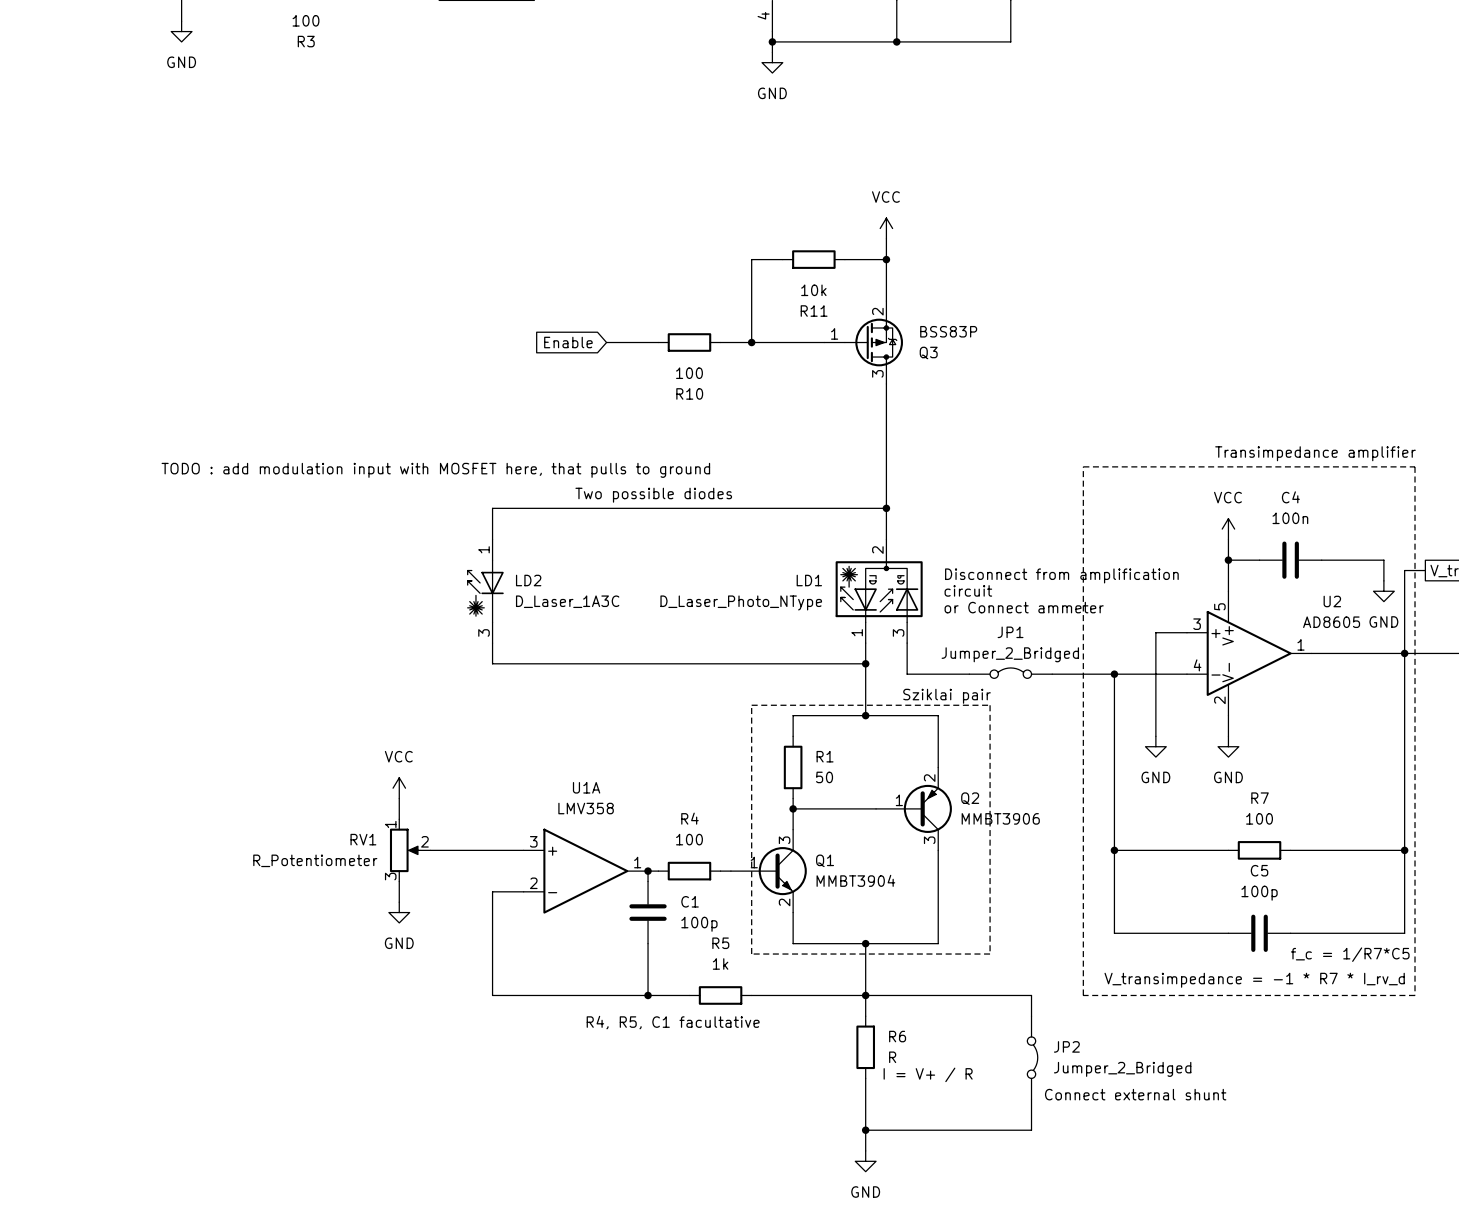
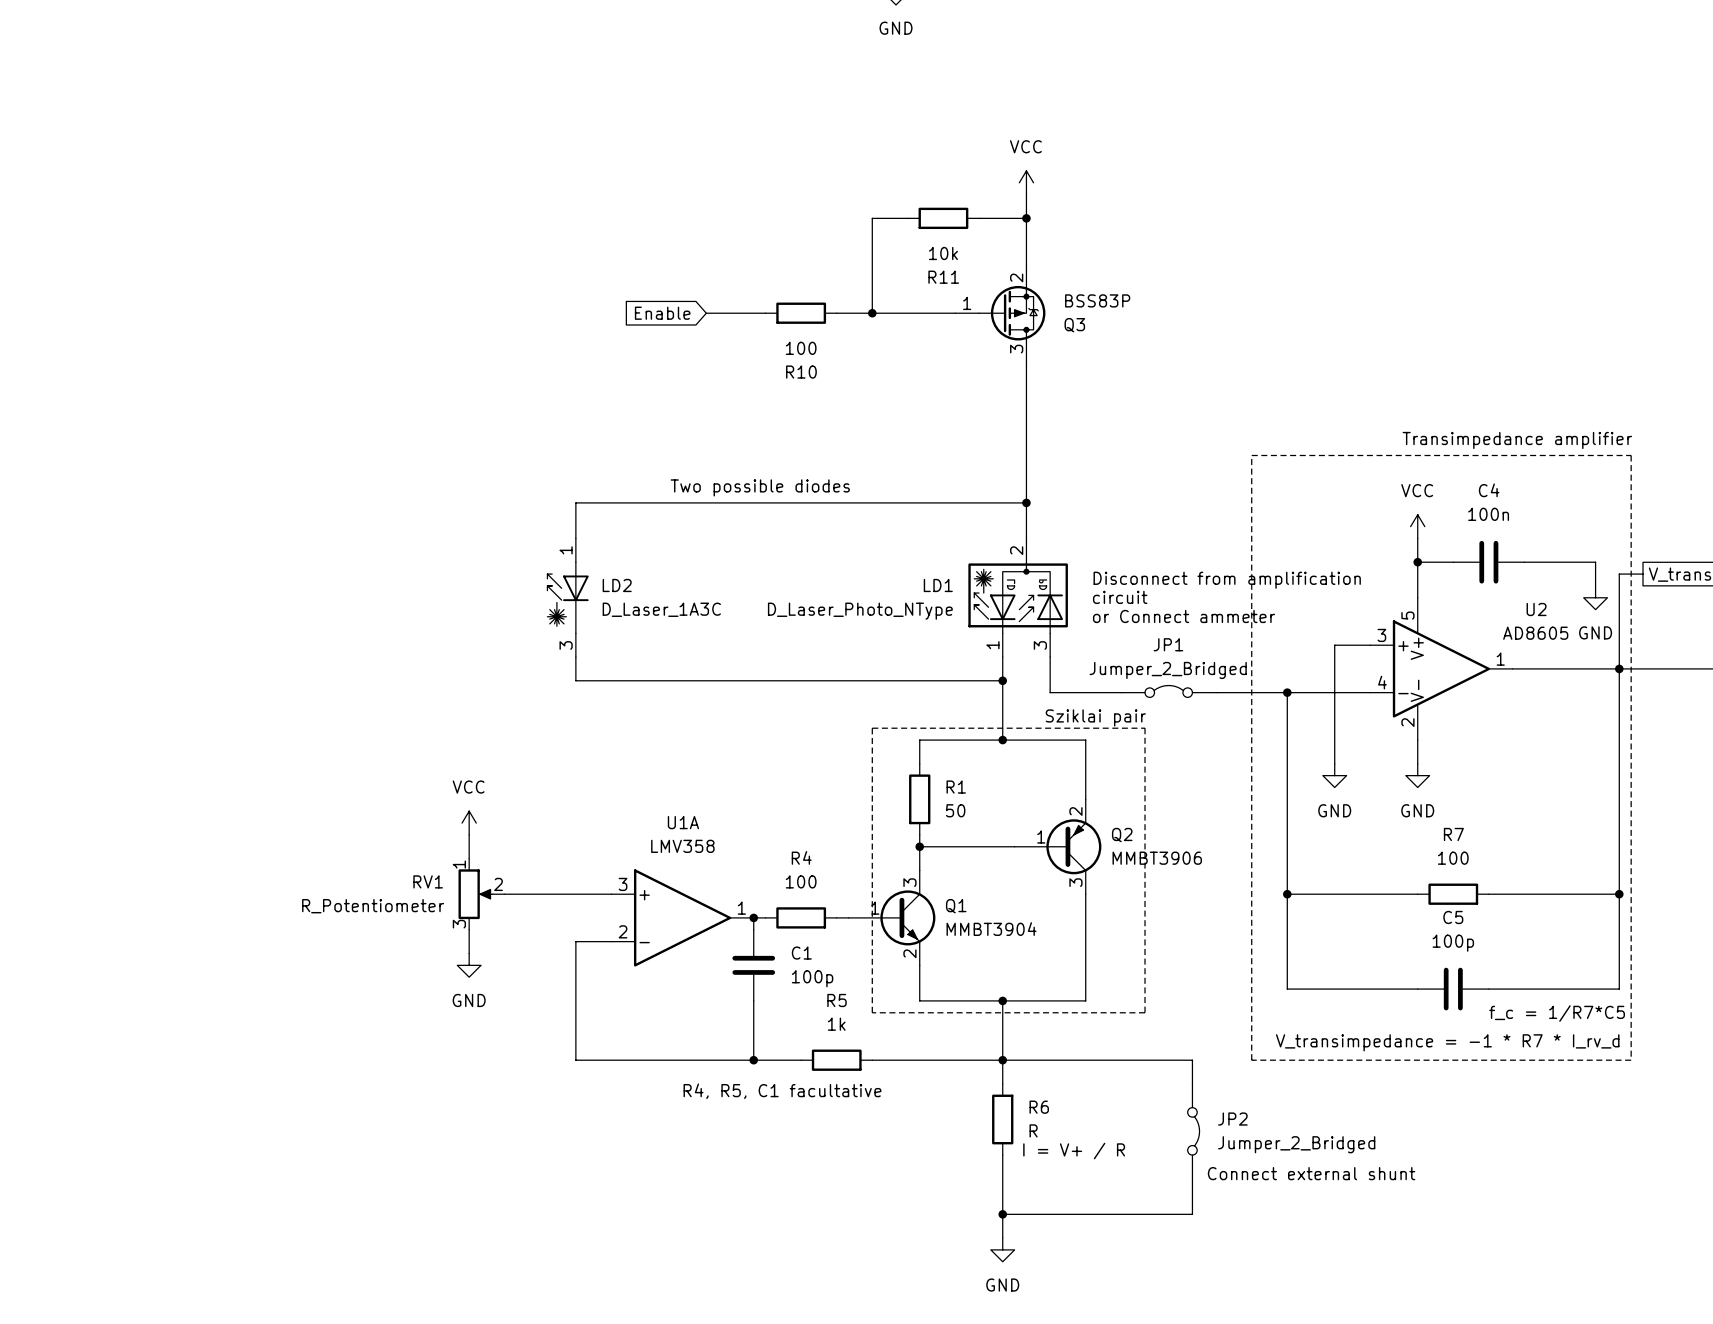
text: TODO : add modulation input with MOSFET here, that pulls to ground (435, 470) -> none

